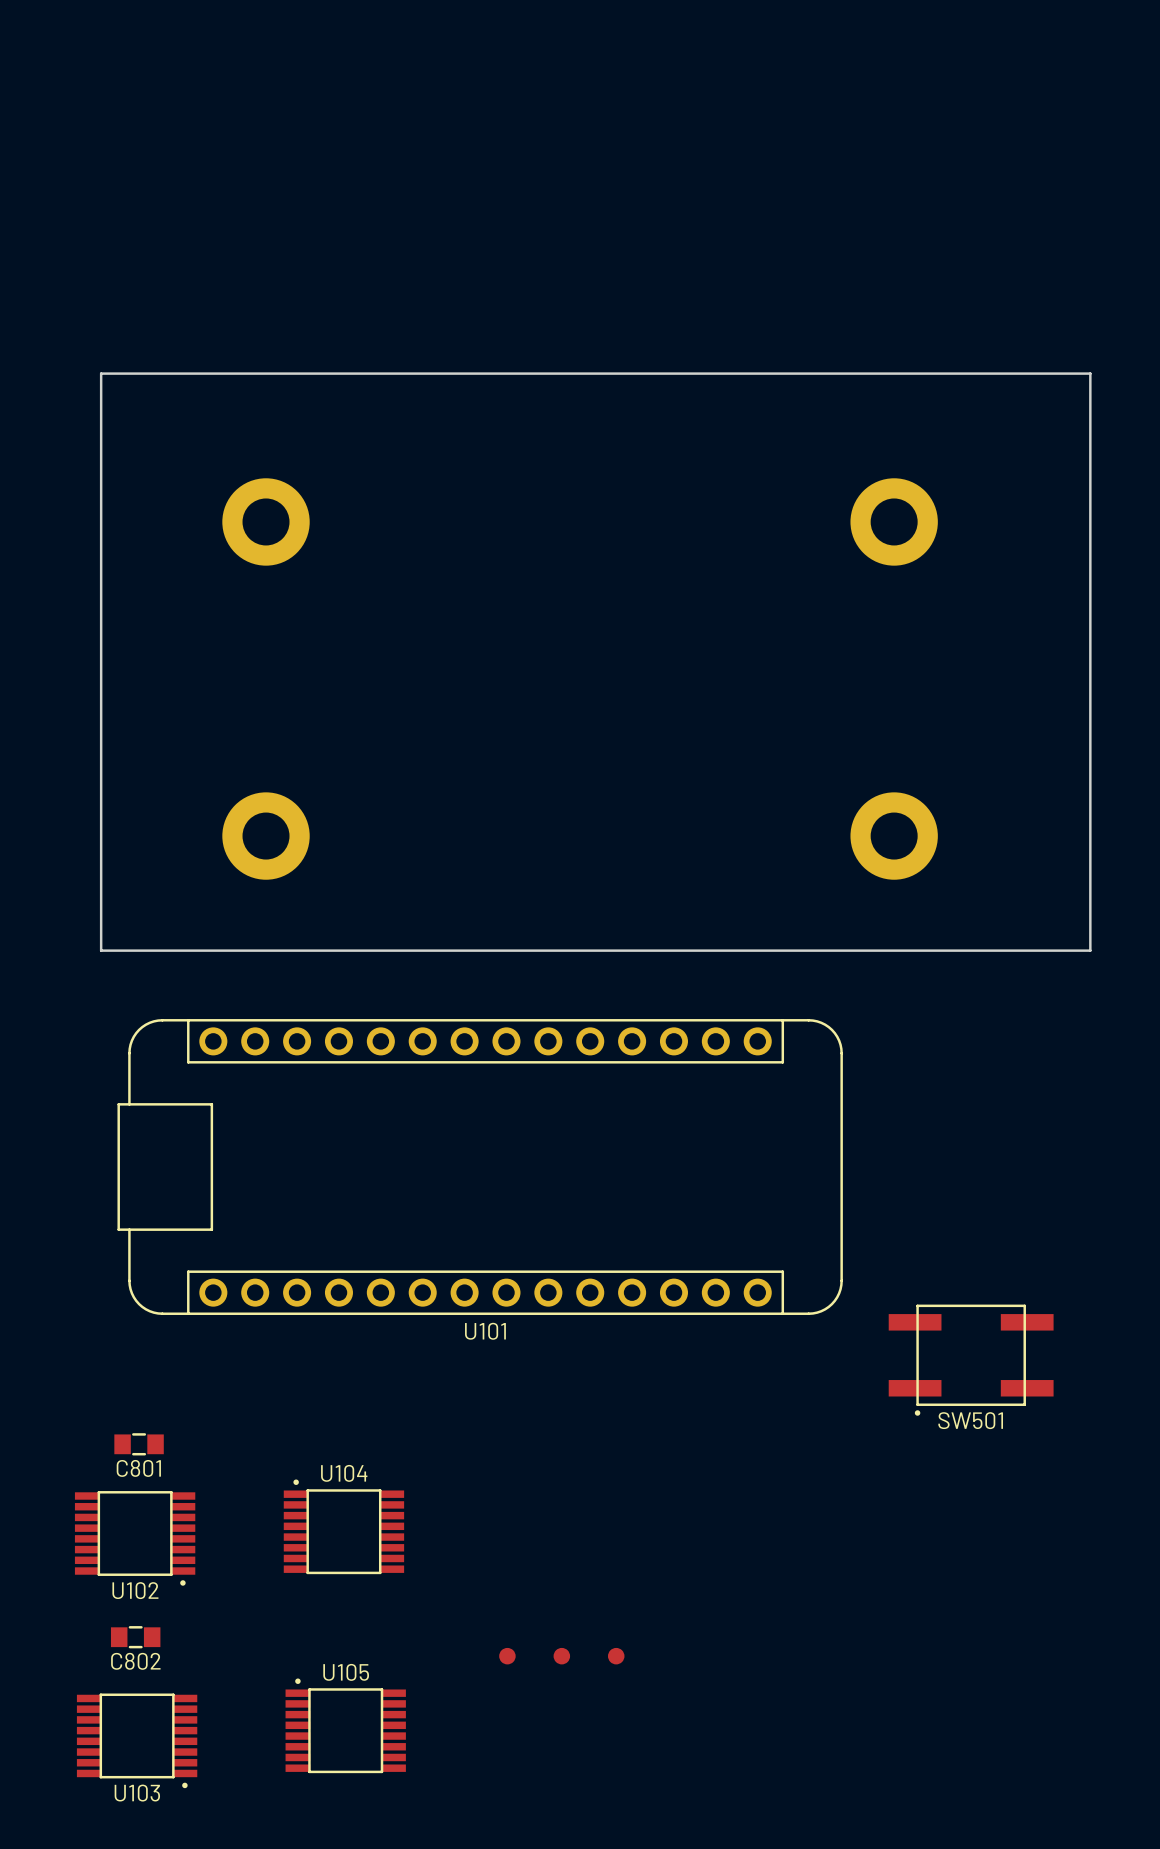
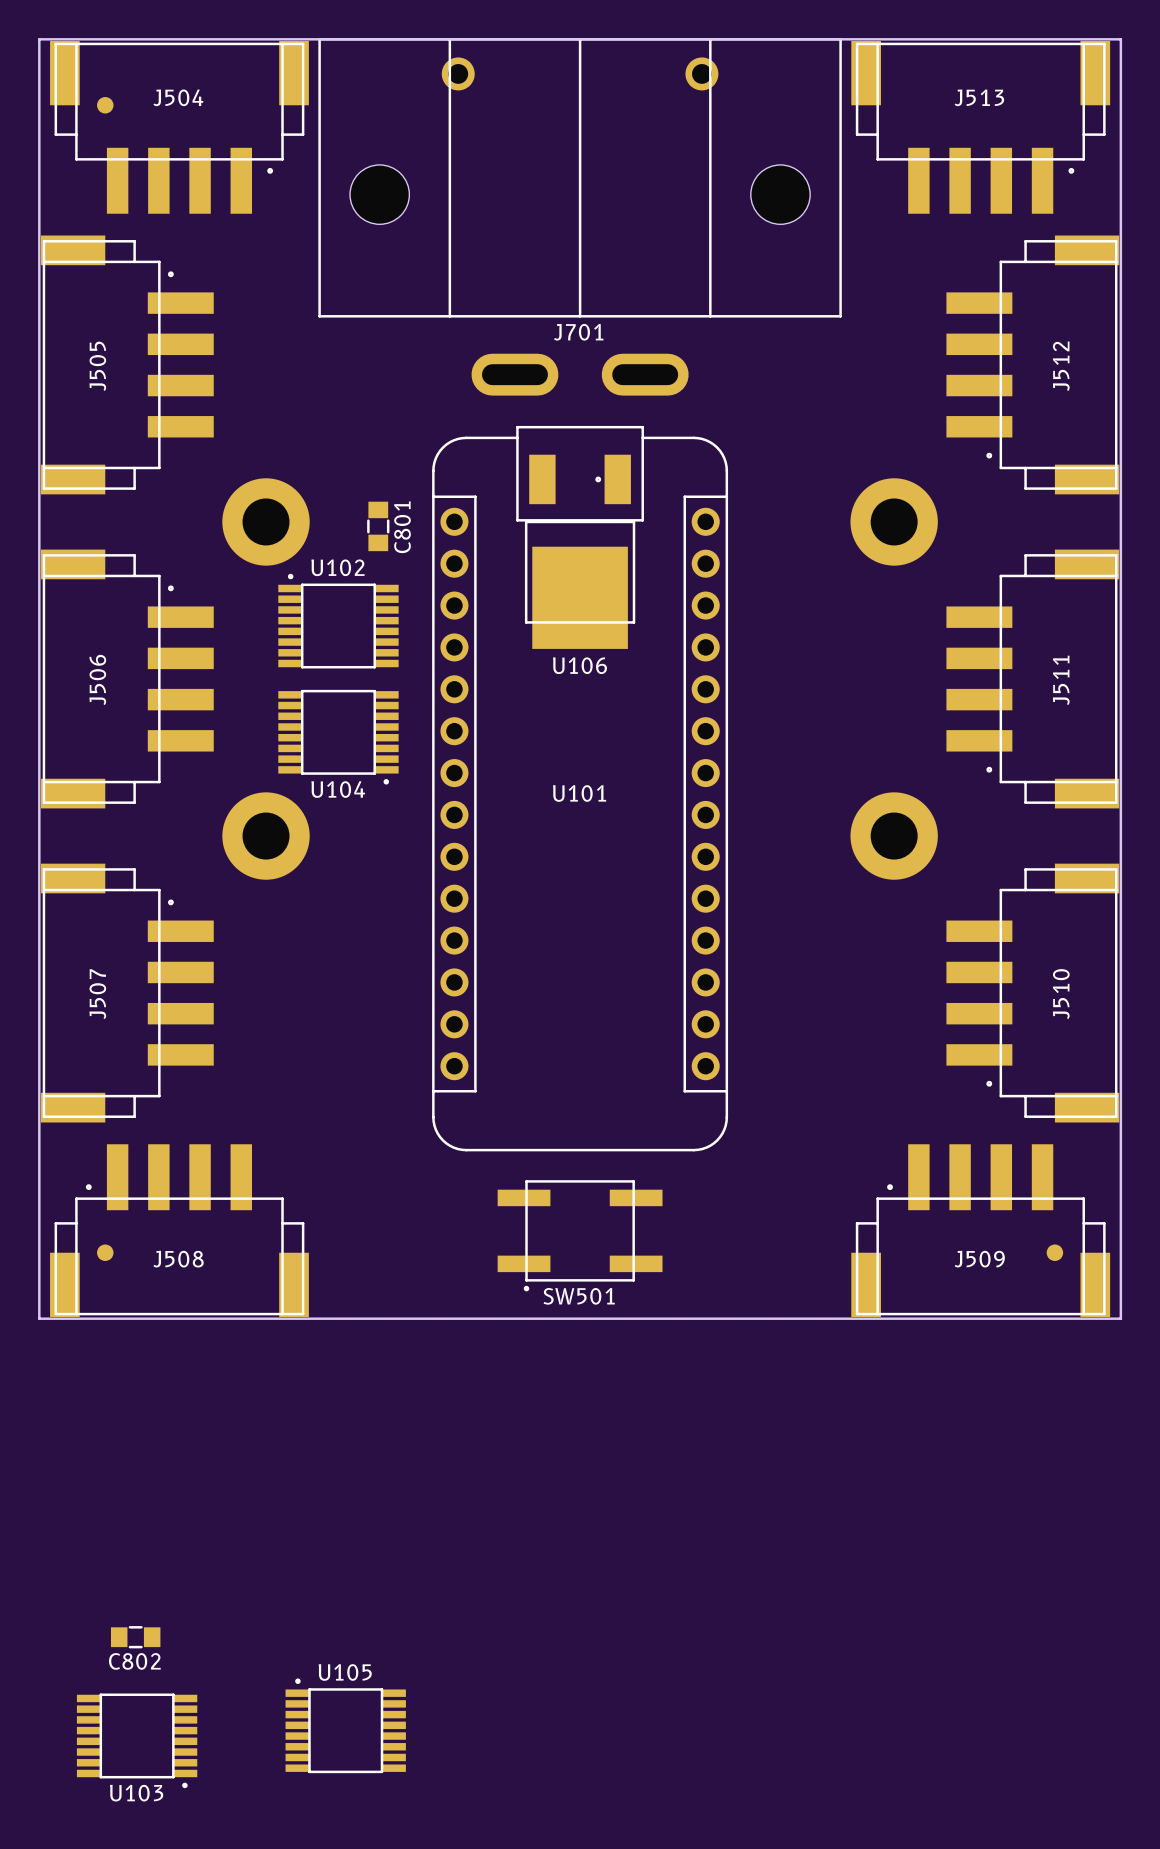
board edge: none -> (39, 39) (39, 1318) (1120, 1318) (1120, 39) (39, 39)
part: none -> (105, 105)
J504: none -> (179, 127)
J513: none -> (980, 127)
J701: none -> (580, 216)
J505: none -> (127, 364)
J512: none -> (1032, 364)
board edge: (101, 373) (101, 950) (1090, 950) (1090, 373) (101, 373) -> none
U106: none -> (580, 551)
J506: none -> (127, 679)
J511: none -> (1032, 679)
J507: none -> (127, 993)
J510: none -> (1032, 993)
U101 rotation: 0° (480, 1167) -> 90° clockwise (580, 788)
J508: none -> (179, 1230)
J509: none -> (980, 1230)
part: none -> (105, 1252)
part: none -> (1054, 1252)
U101 name position: U101 (485, 1331) -> U101 (579, 793)
SW501 position: (971, 1360) -> (580, 1235)
C801 rotation: 0° (139, 1444) -> 90° clockwise (378, 526)
C801 position: (139, 1444) -> (378, 526)
C801 name position: C801 (138, 1468) -> C801 (402, 527)
U104 rotation: 0° (343, 1526) -> 180° (338, 737)
U104 position: (343, 1526) -> (338, 737)
U102 rotation: 0° (135, 1538) -> 180° (338, 621)
U102 position: (135, 1538) -> (338, 621)
part: (507, 1656) -> none
part: (561, 1656) -> none
part: (616, 1656) -> none

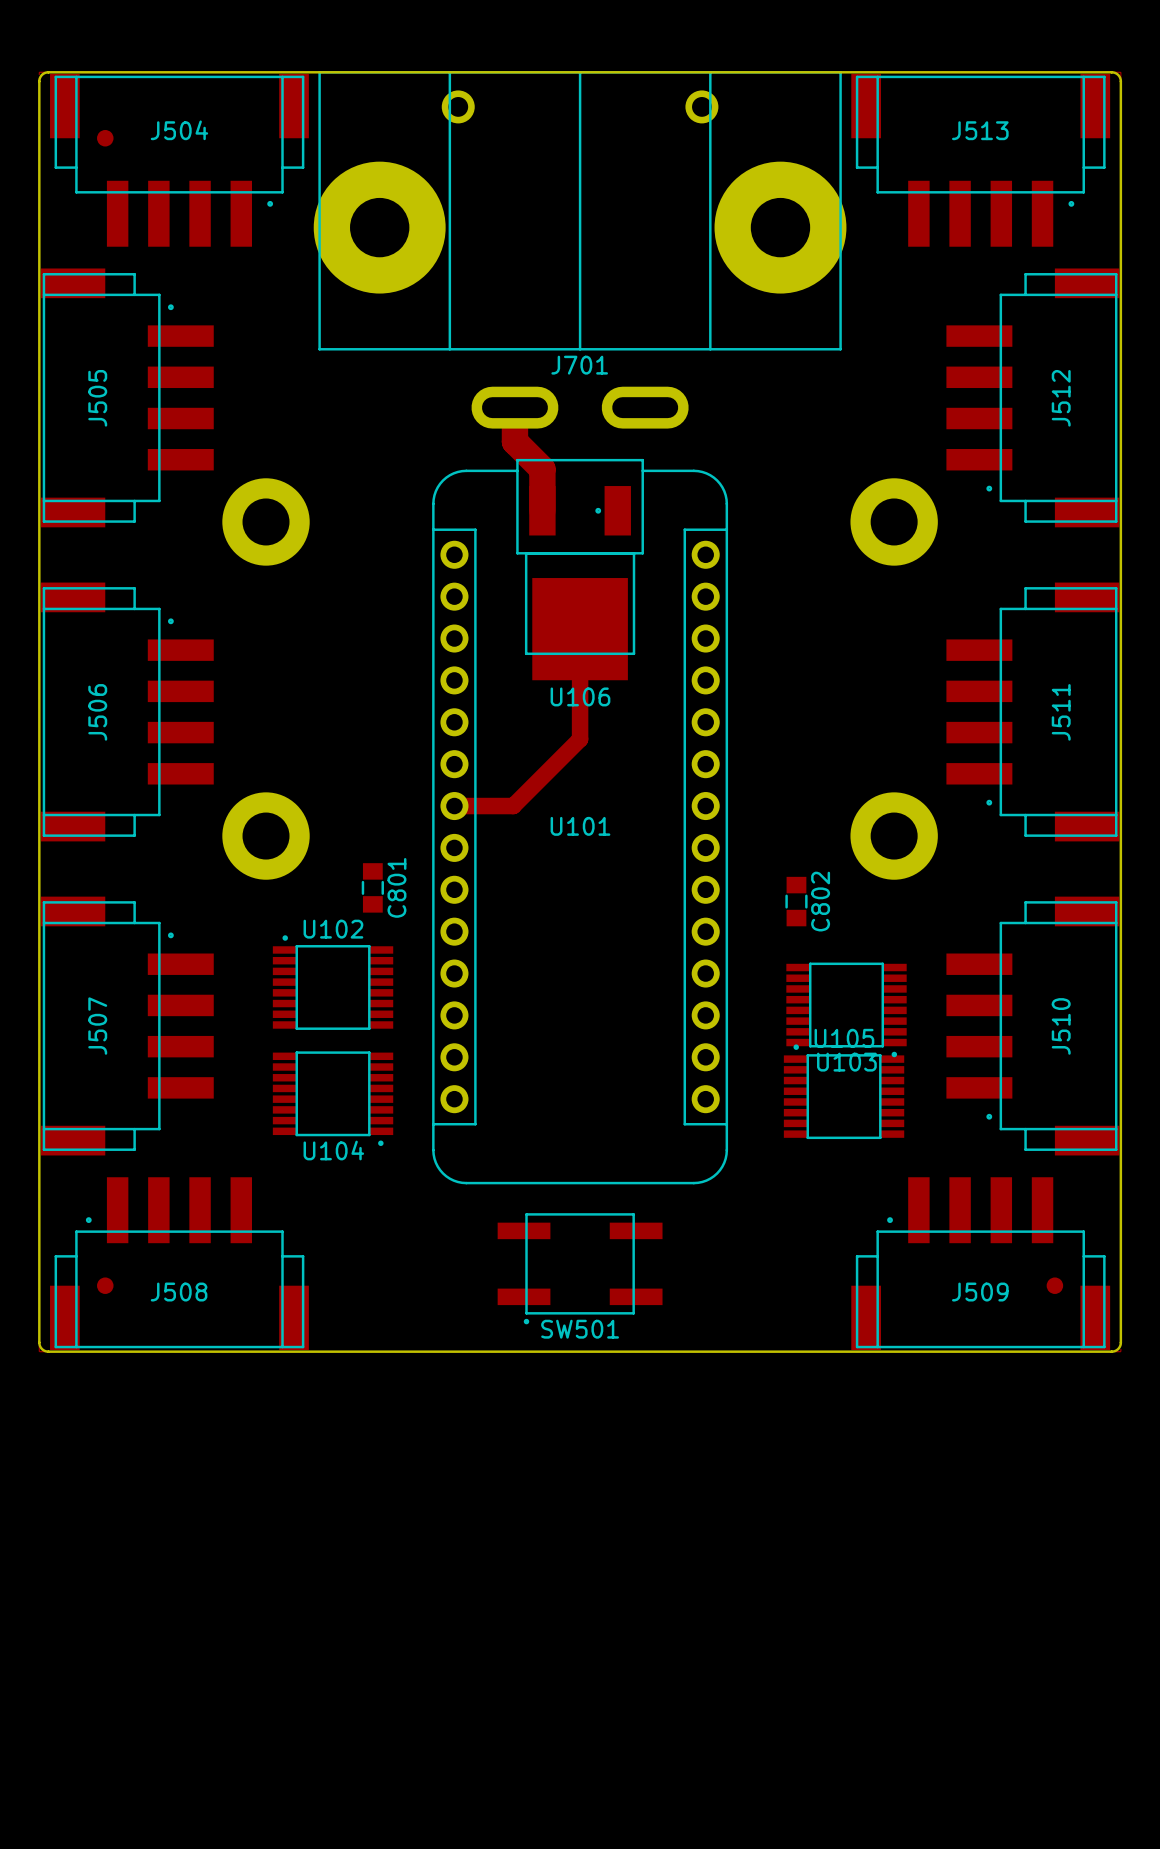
J701 footprint: [318, 38, 842, 396] -> [313, 71, 847, 429]
board edge: none -> (48, 72) (41, 74) (39, 81)
board edge: (39, 81) (39, 39) (1120, 39) (1120, 81) -> (48, 72) (1111, 72) (1118, 74) (1120, 81)
part position: (105, 105) -> (105, 138)
J504 position: (179, 127) -> (179, 160)
J513 position: (980, 127) -> (980, 160)
J505 position: (127, 364) -> (127, 397)
J512 position: (1032, 364) -> (1032, 397)
track: none -> (514, 407) (514, 441) (542, 469) (542, 510)
C801 position: (378, 526) -> (372, 887)
U106 position: (580, 551) -> (580, 583)
U102 position: (338, 621) -> (333, 982)
track: none -> (580, 629) (580, 739) (513, 806) (454, 806)
J506 position: (127, 679) -> (127, 711)
J511 position: (1032, 679) -> (1032, 711)
U104 position: (338, 737) -> (333, 1098)
U101 position: (580, 788) -> (580, 821)
J507 position: (127, 993) -> (127, 1026)
J510 position: (1032, 993) -> (1032, 1026)
J508 position: (179, 1230) -> (179, 1263)
J509 position: (980, 1230) -> (980, 1263)
SW501 position: (580, 1235) -> (580, 1268)
part position: (105, 1252) -> (105, 1285)
part position: (1054, 1252) -> (1054, 1285)
board edge: (39, 1318) (1120, 1318) -> (48, 1351) (1111, 1351) (1117, 1349) (1120, 1344) (1120, 1318)
board edge: none -> (39, 1318) (39, 1344) (42, 1349) (48, 1351)
C802 rotation: 0° (135, 1637) -> 90° clockwise (796, 901)
C802 position: (135, 1637) -> (796, 901)
C802 name position: C802 (134, 1661) -> C802 (820, 901)
U105 position: (345, 1725) -> (844, 1091)
U103 position: (137, 1740) -> (846, 1009)

